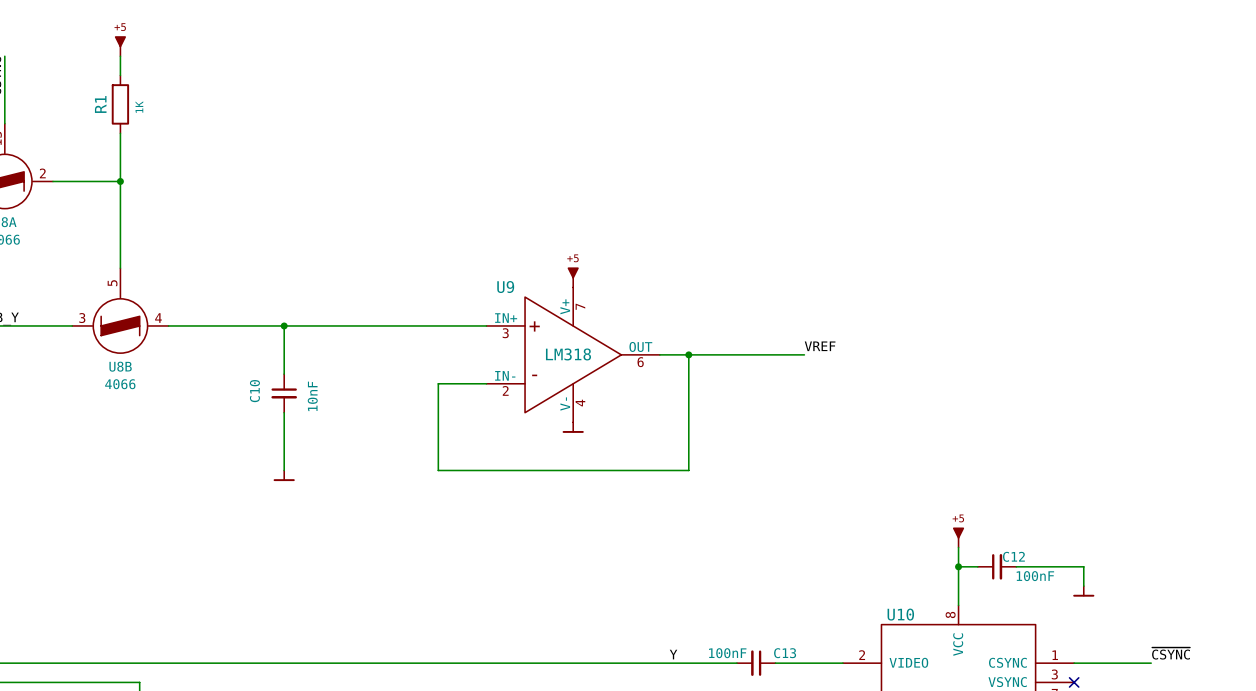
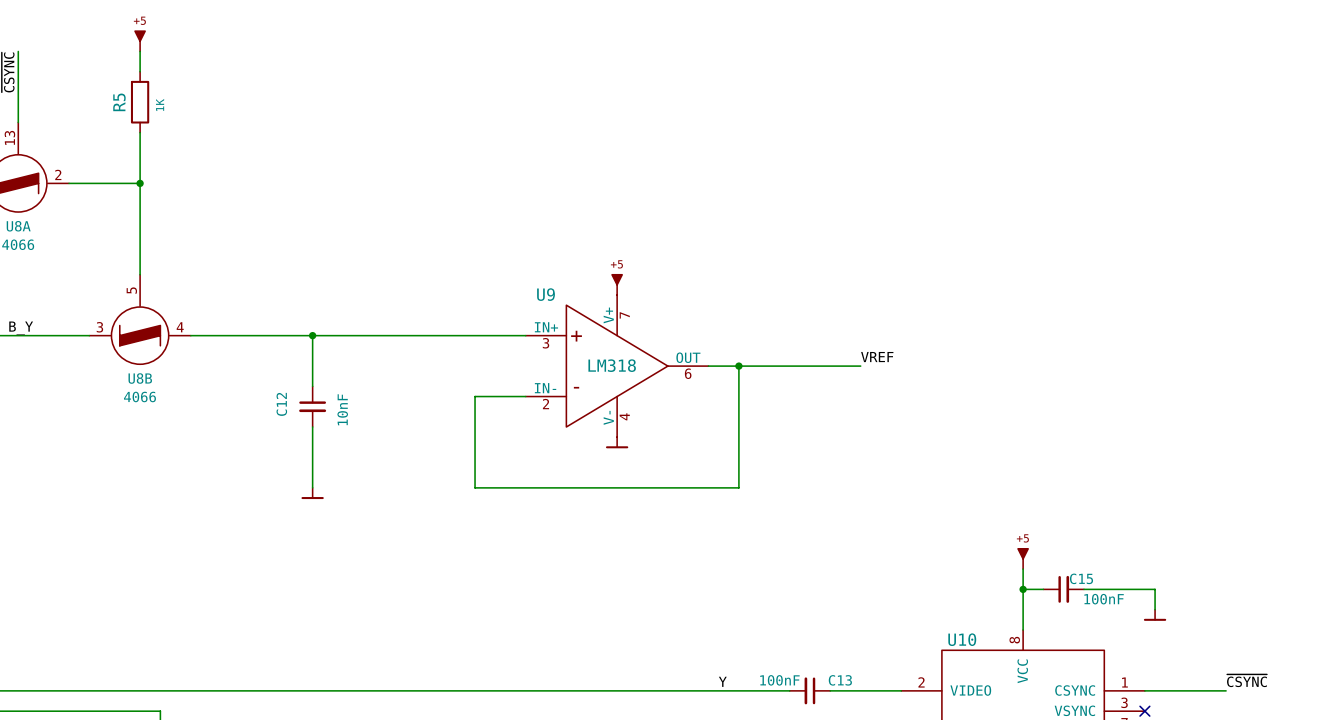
R1 name: R1 (100, 104) -> R5 (119, 102)
C10 name: C10 (254, 391) -> C12 (281, 404)
C12 name: C12 (1013, 556) -> C15 (1081, 578)

